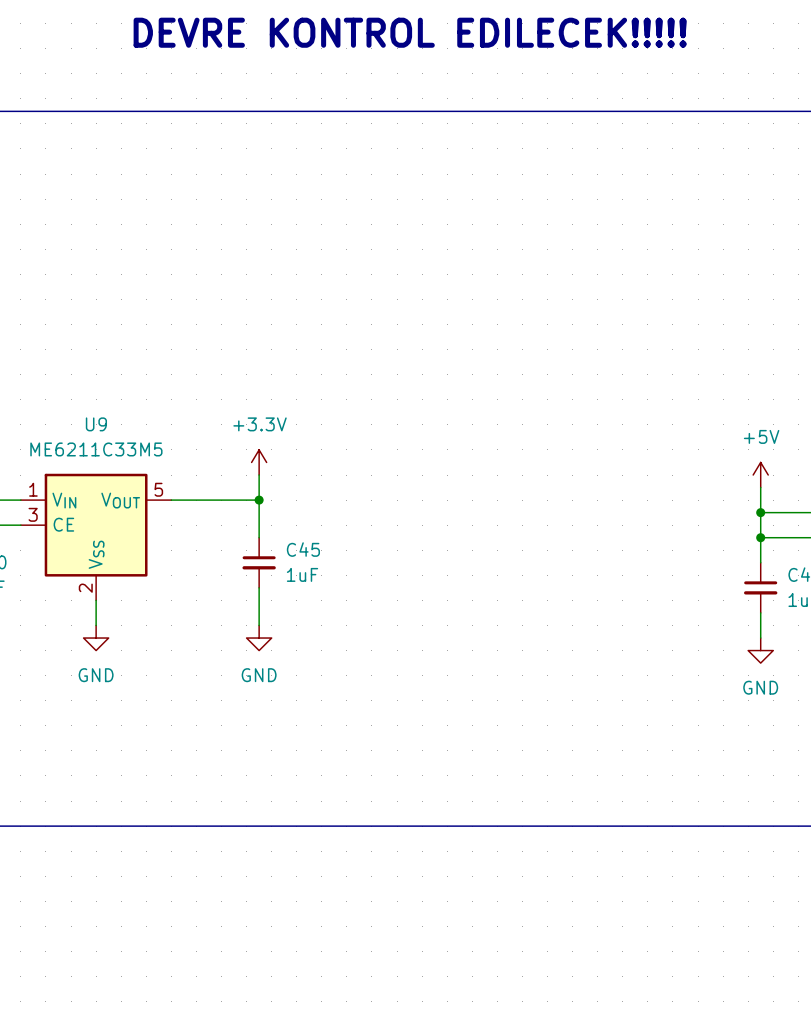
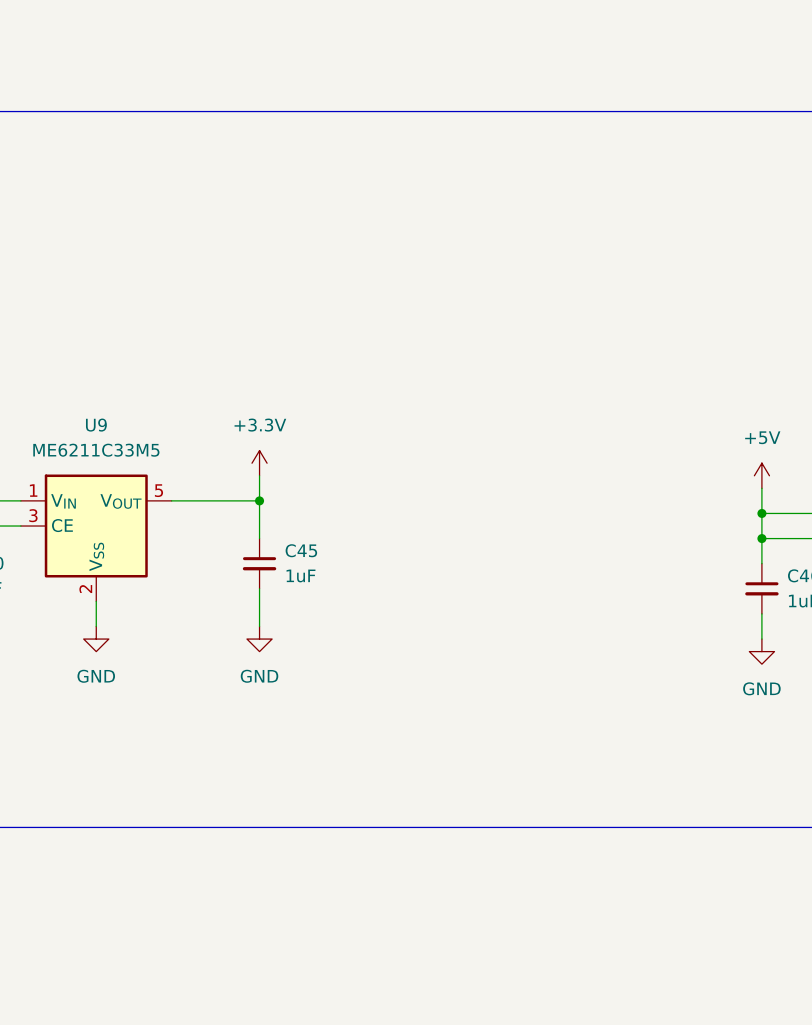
text: DEVRE KONTROL EDILECEK!!!!! (410, 32) -> none

